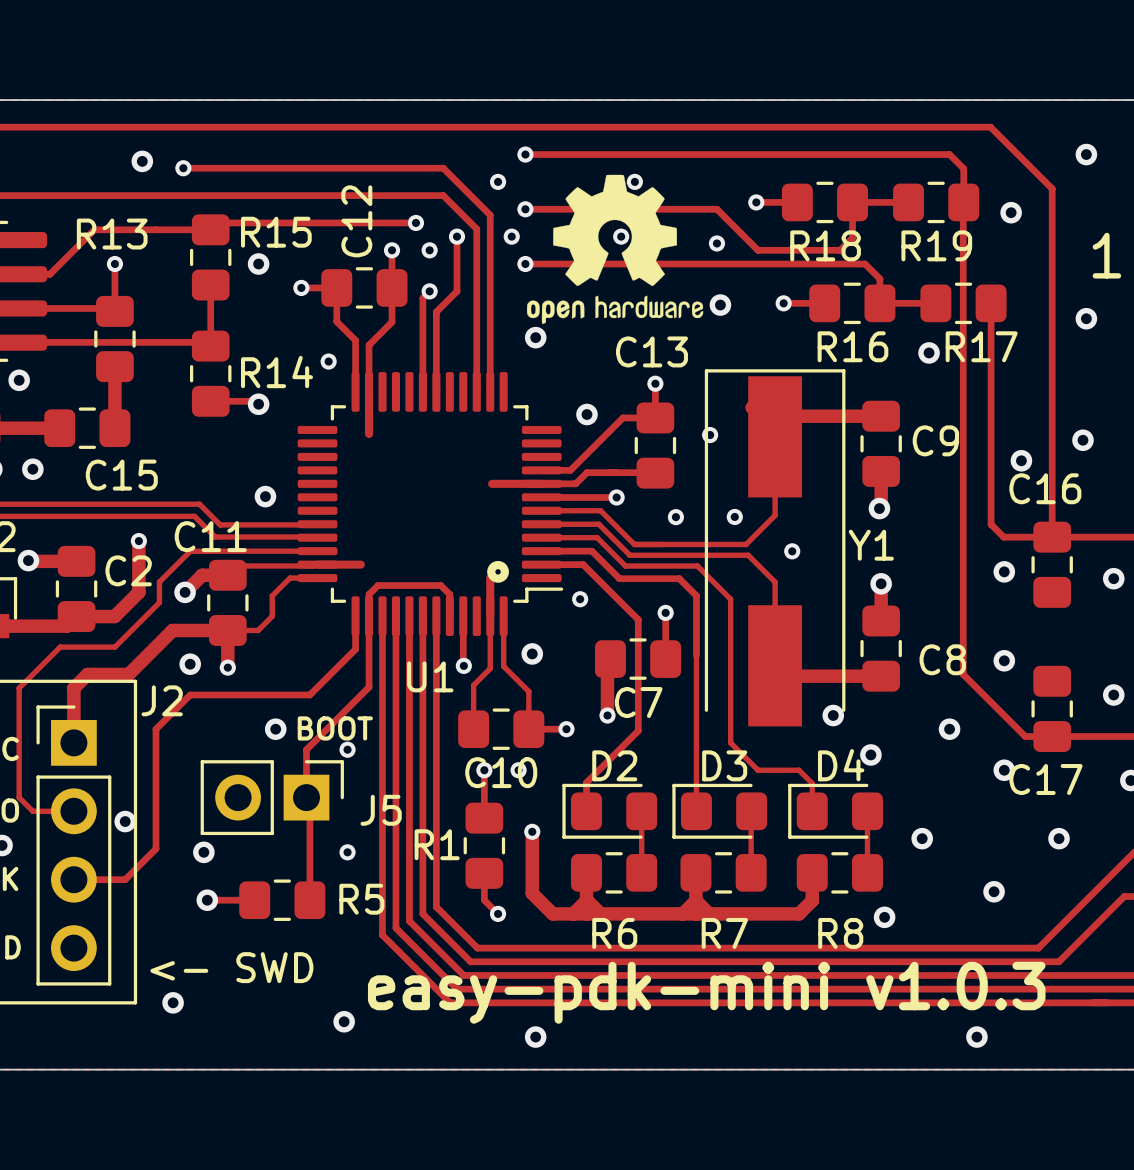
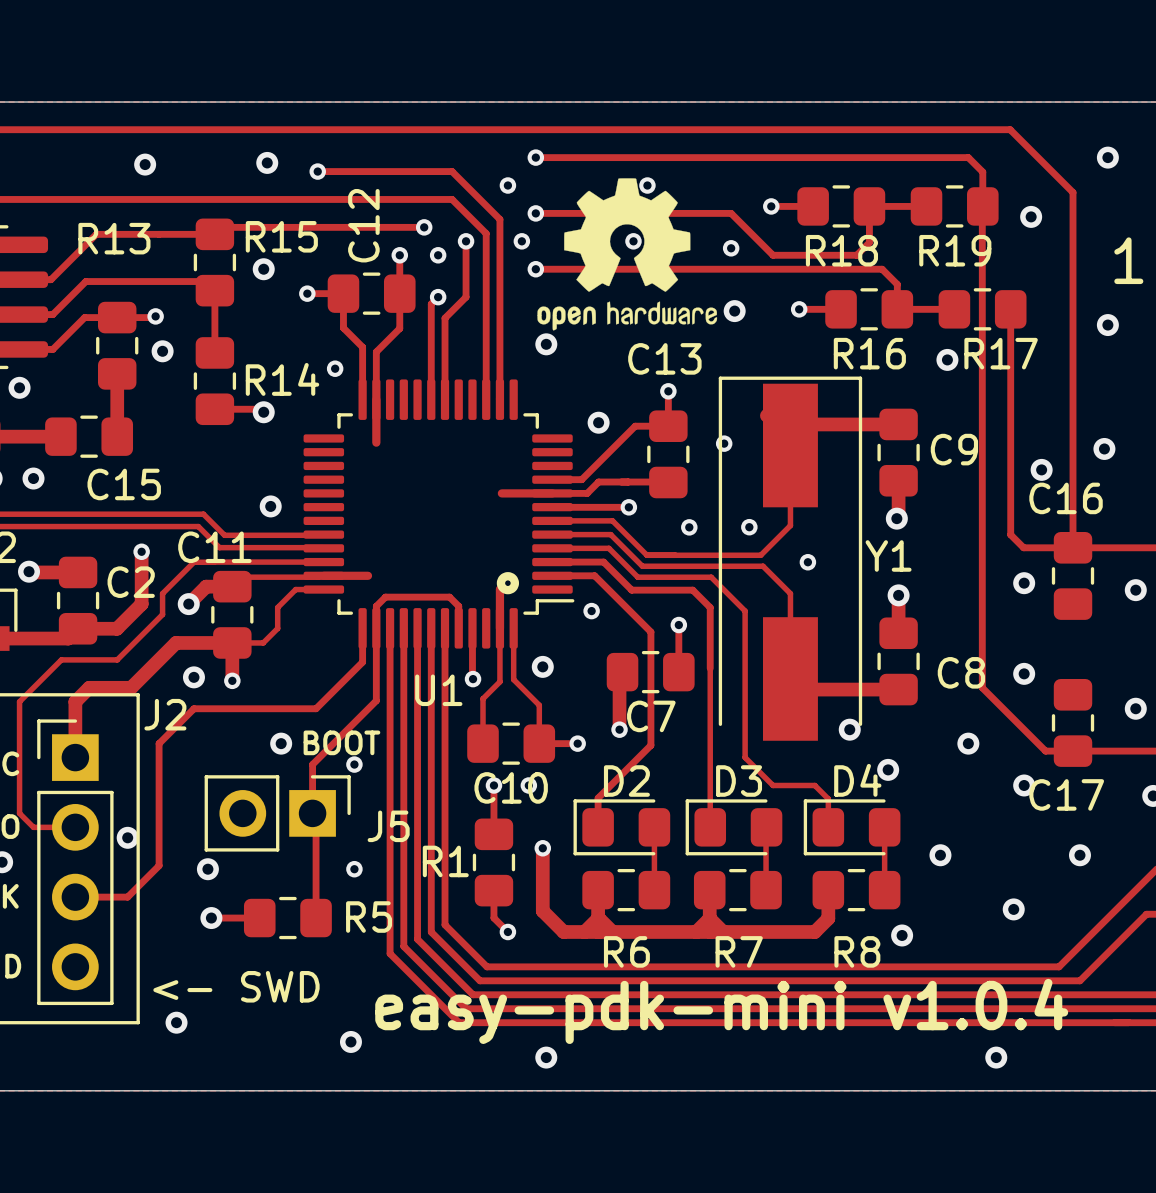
via: none -> (267, 162)
track: (183, 168) (311, 168) -> none
via: (183, 168) -> none
via: none -> (317, 171)
track: (114, 264) (114, 311) -> none
via position: (114, 264) -> (155, 316)
track: (51, 308) (112, 308) -> (52, 314) (85, 281) (205, 281) (214, 290)
track: (21, 342) (207, 342) -> (21, 349) (52, 349) (84, 317) (155, 316)
via: none -> (162, 351)
text: easy-pdk-mini v1.0.3 (706, 992) -> easy-pdk-mini v1.0.4 (721, 1011)

